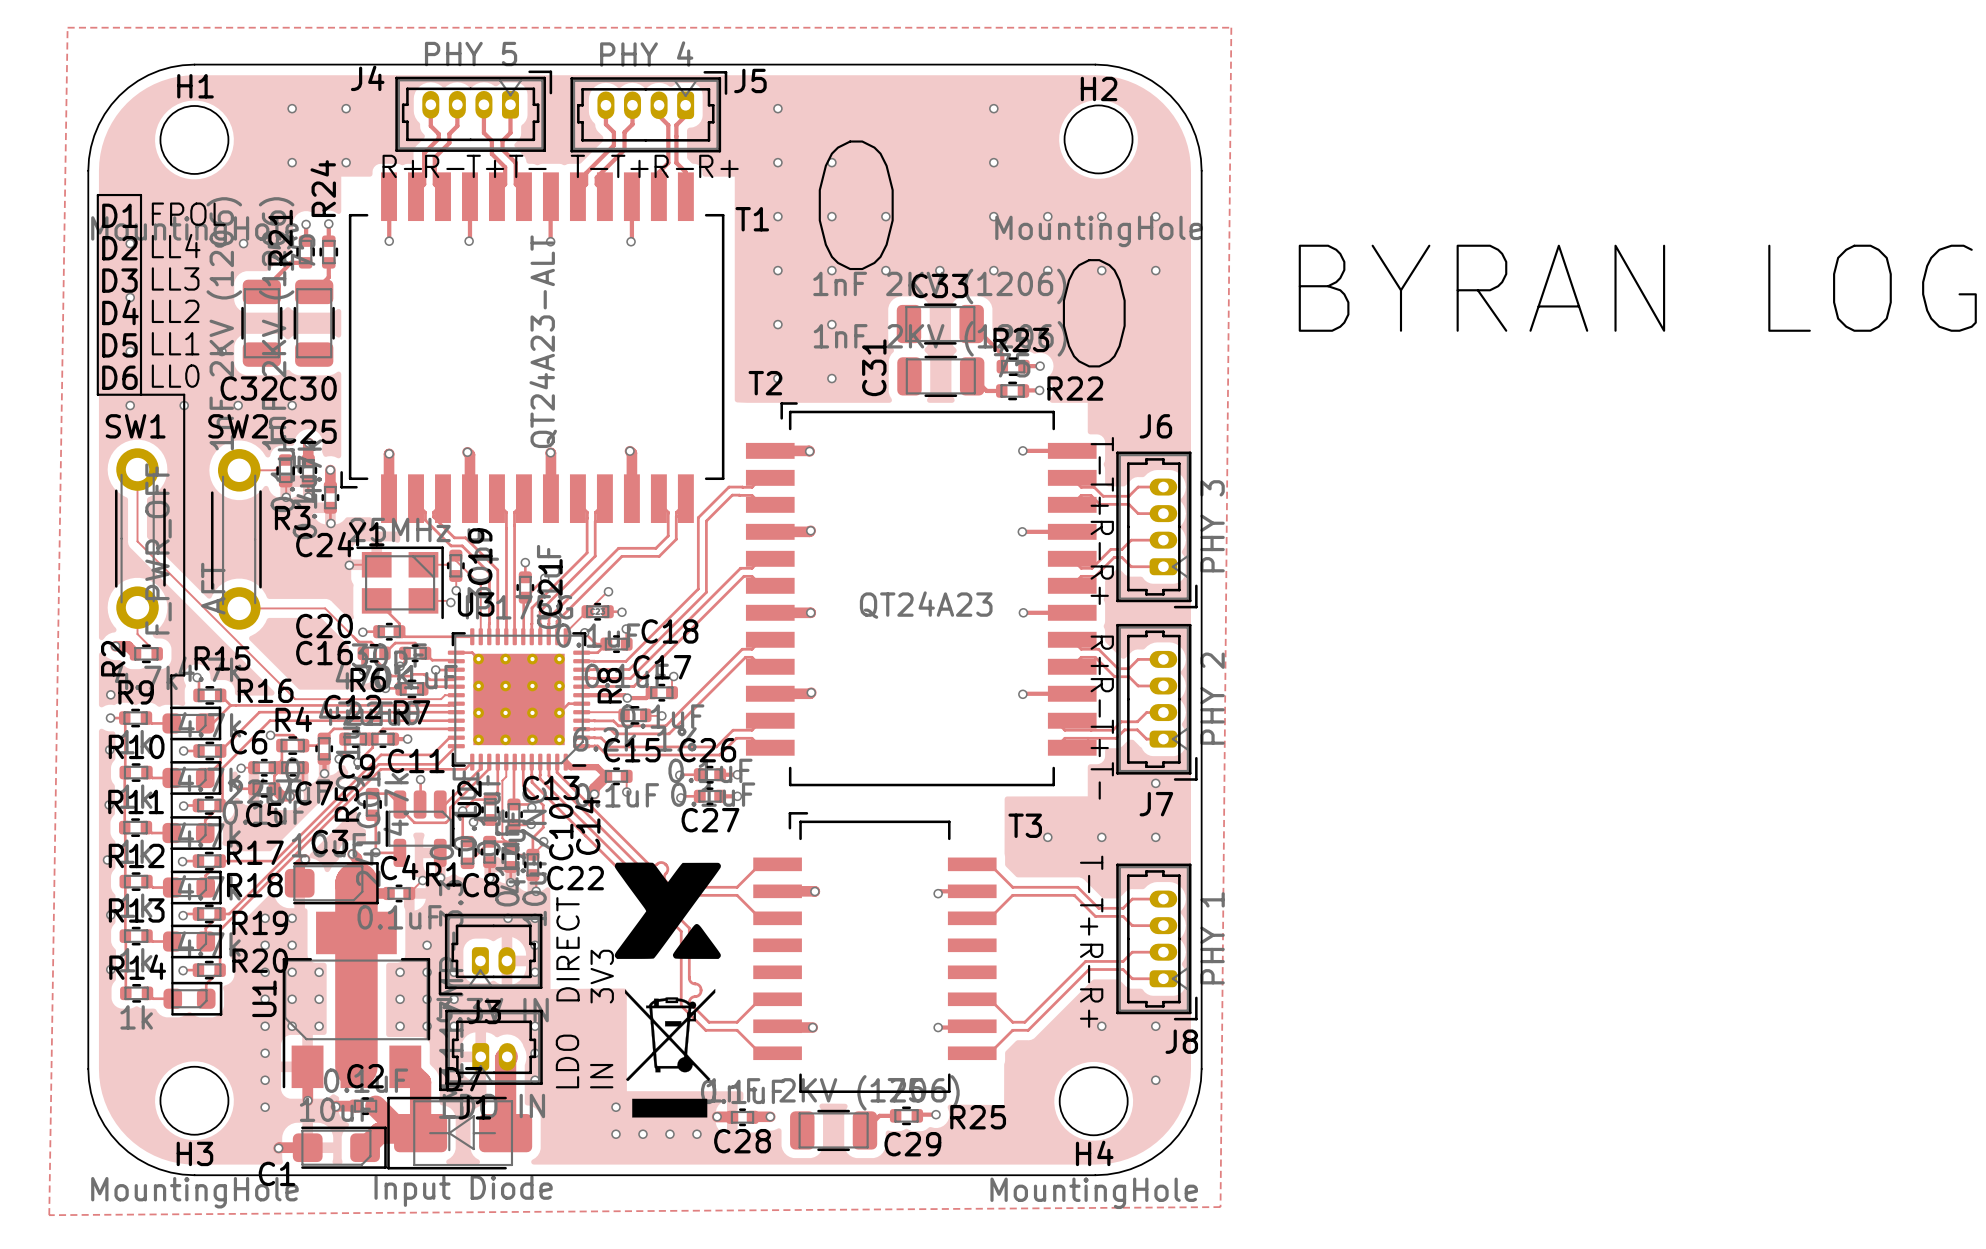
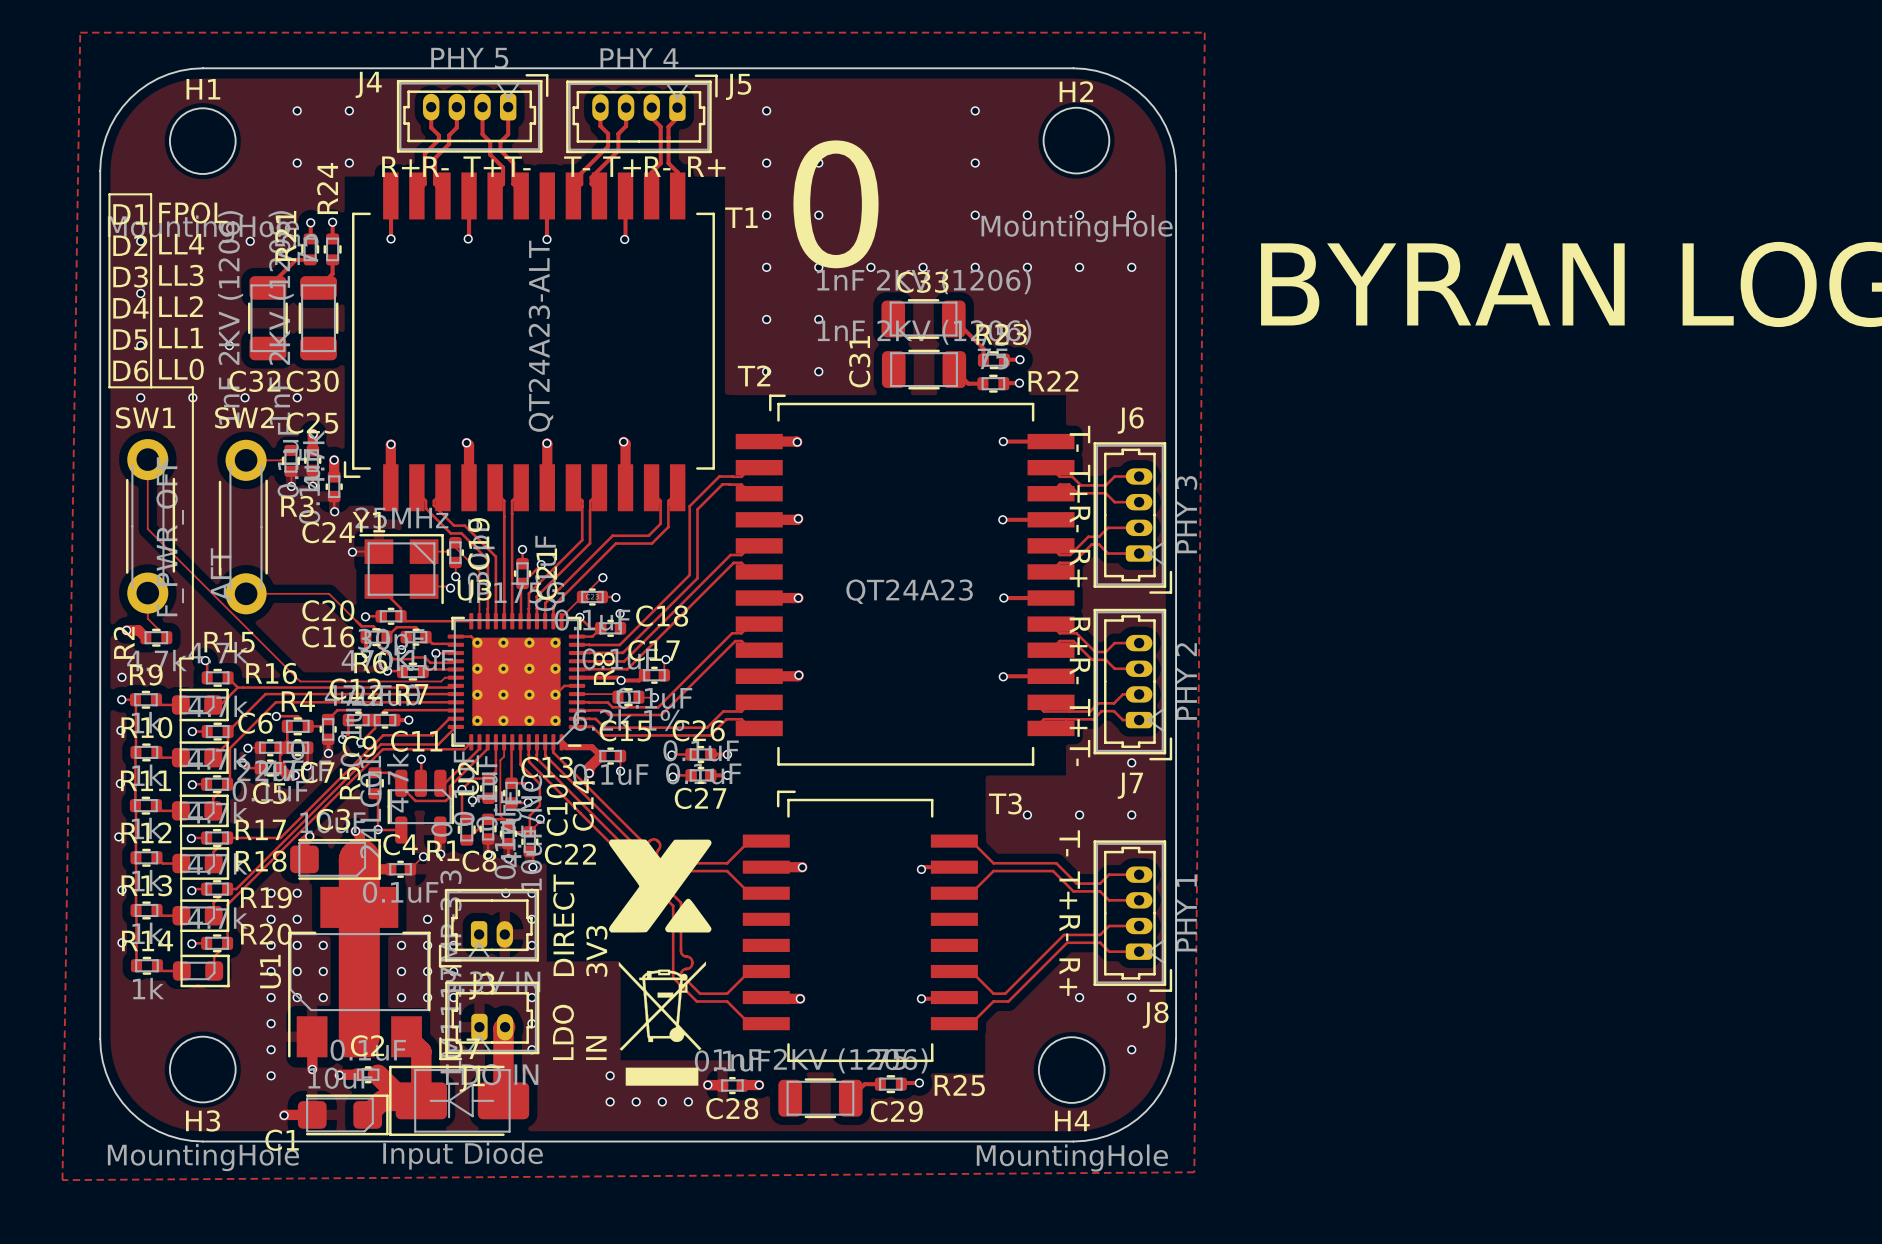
text: 0 (1094, 313) -> none

